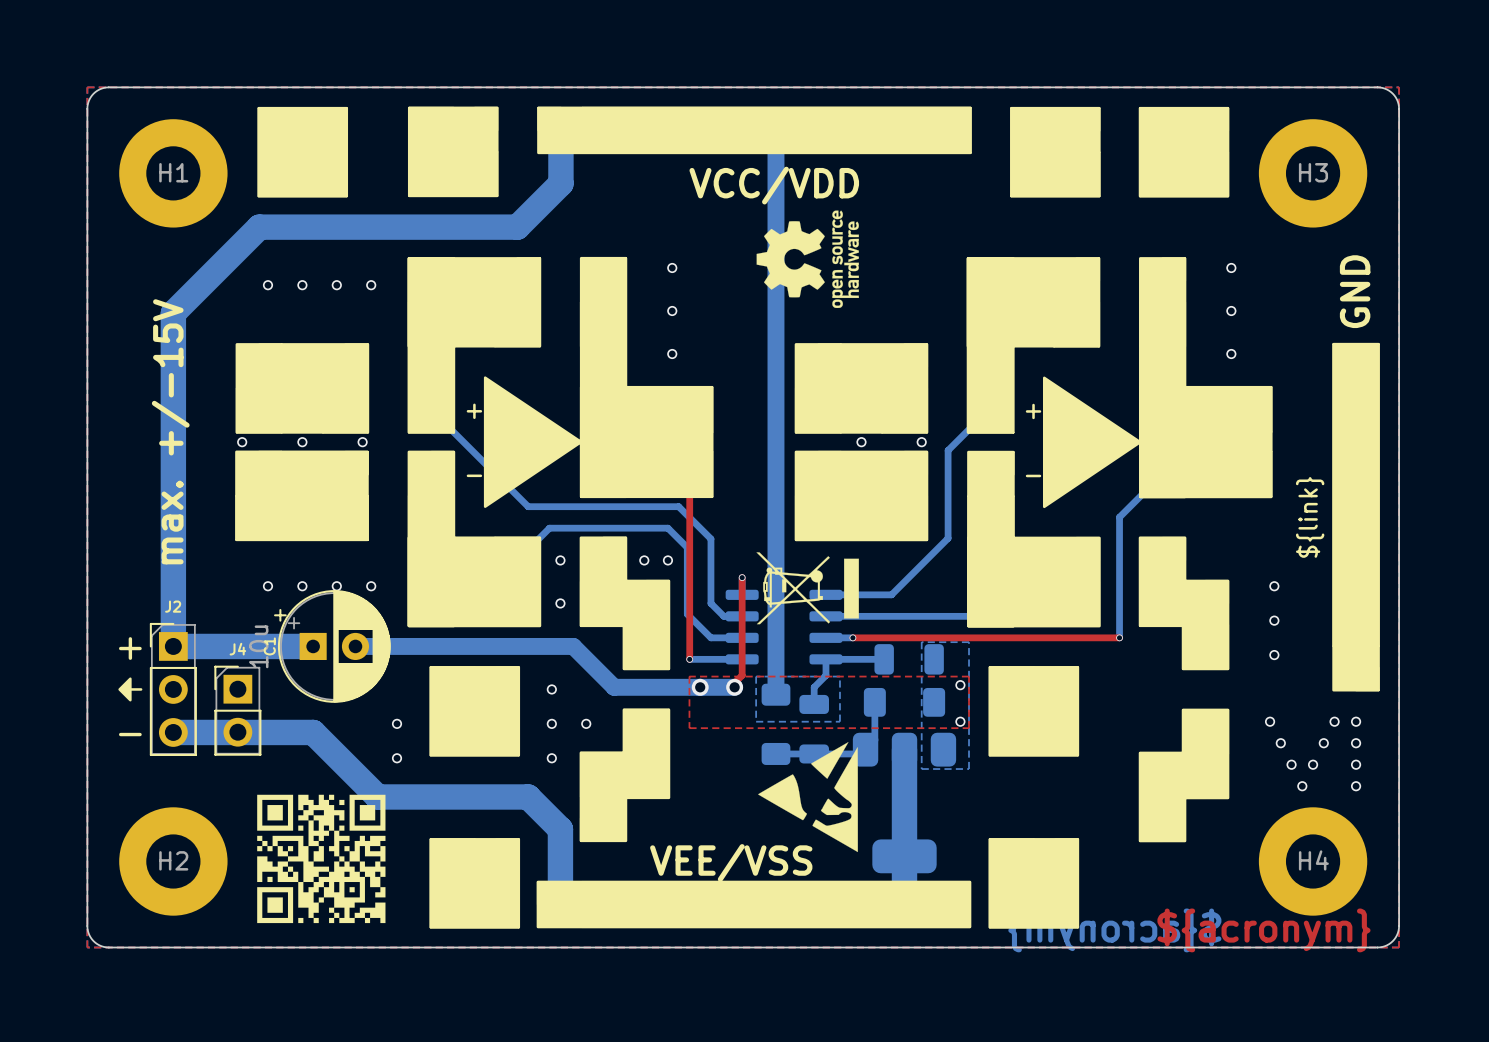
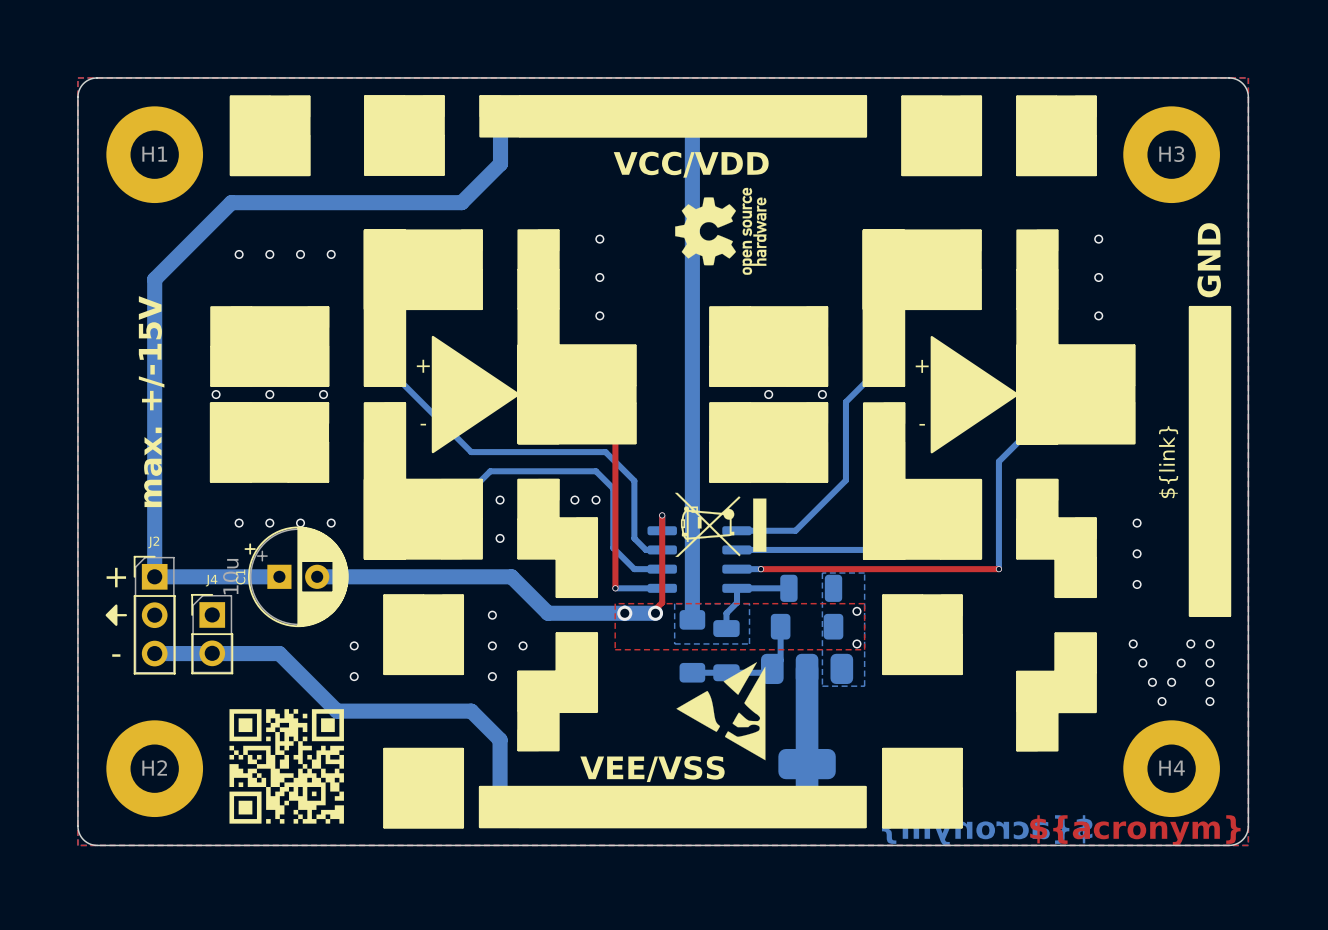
bottom track width: thick (560, 130) (560, 183) (517, 227) (259, 227) (173, 313) (173, 646) (313, 646) -> thin (500, 116) (500, 163) (461, 202) (231, 202) (154, 279) (154, 576) (279, 576)
bottom track width: thick (173, 732) (313, 732) (377, 796) (528, 796) (560, 829) (560, 904) -> thin (154, 653) (279, 653) (336, 711) (471, 711) (500, 739) (500, 807)

